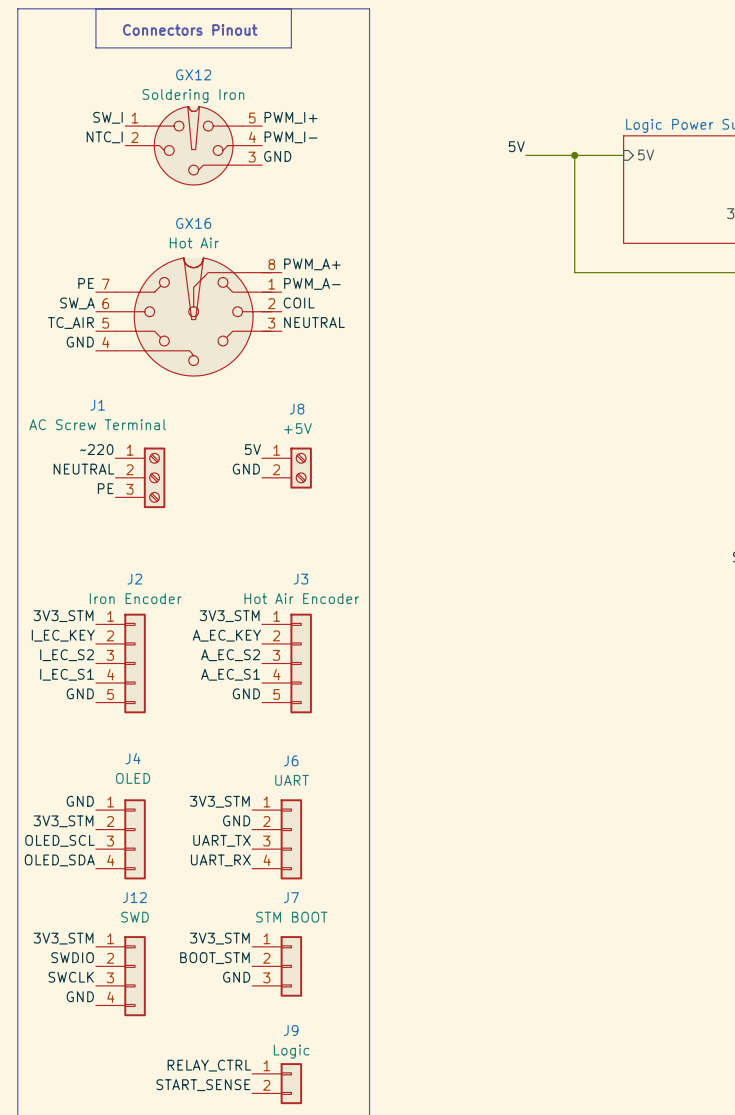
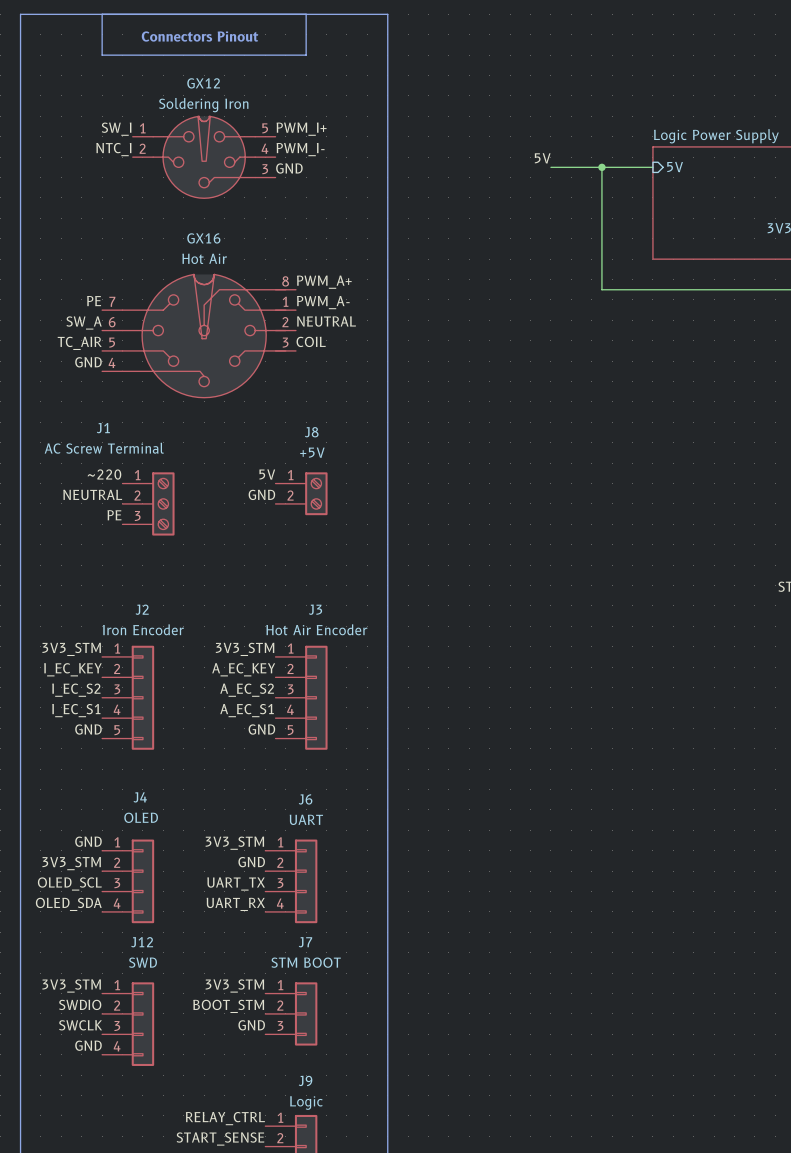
label: COIL (299, 303) -> NEUTRAL (326, 321)
label: NEUTRAL (314, 322) -> COIL (311, 341)

